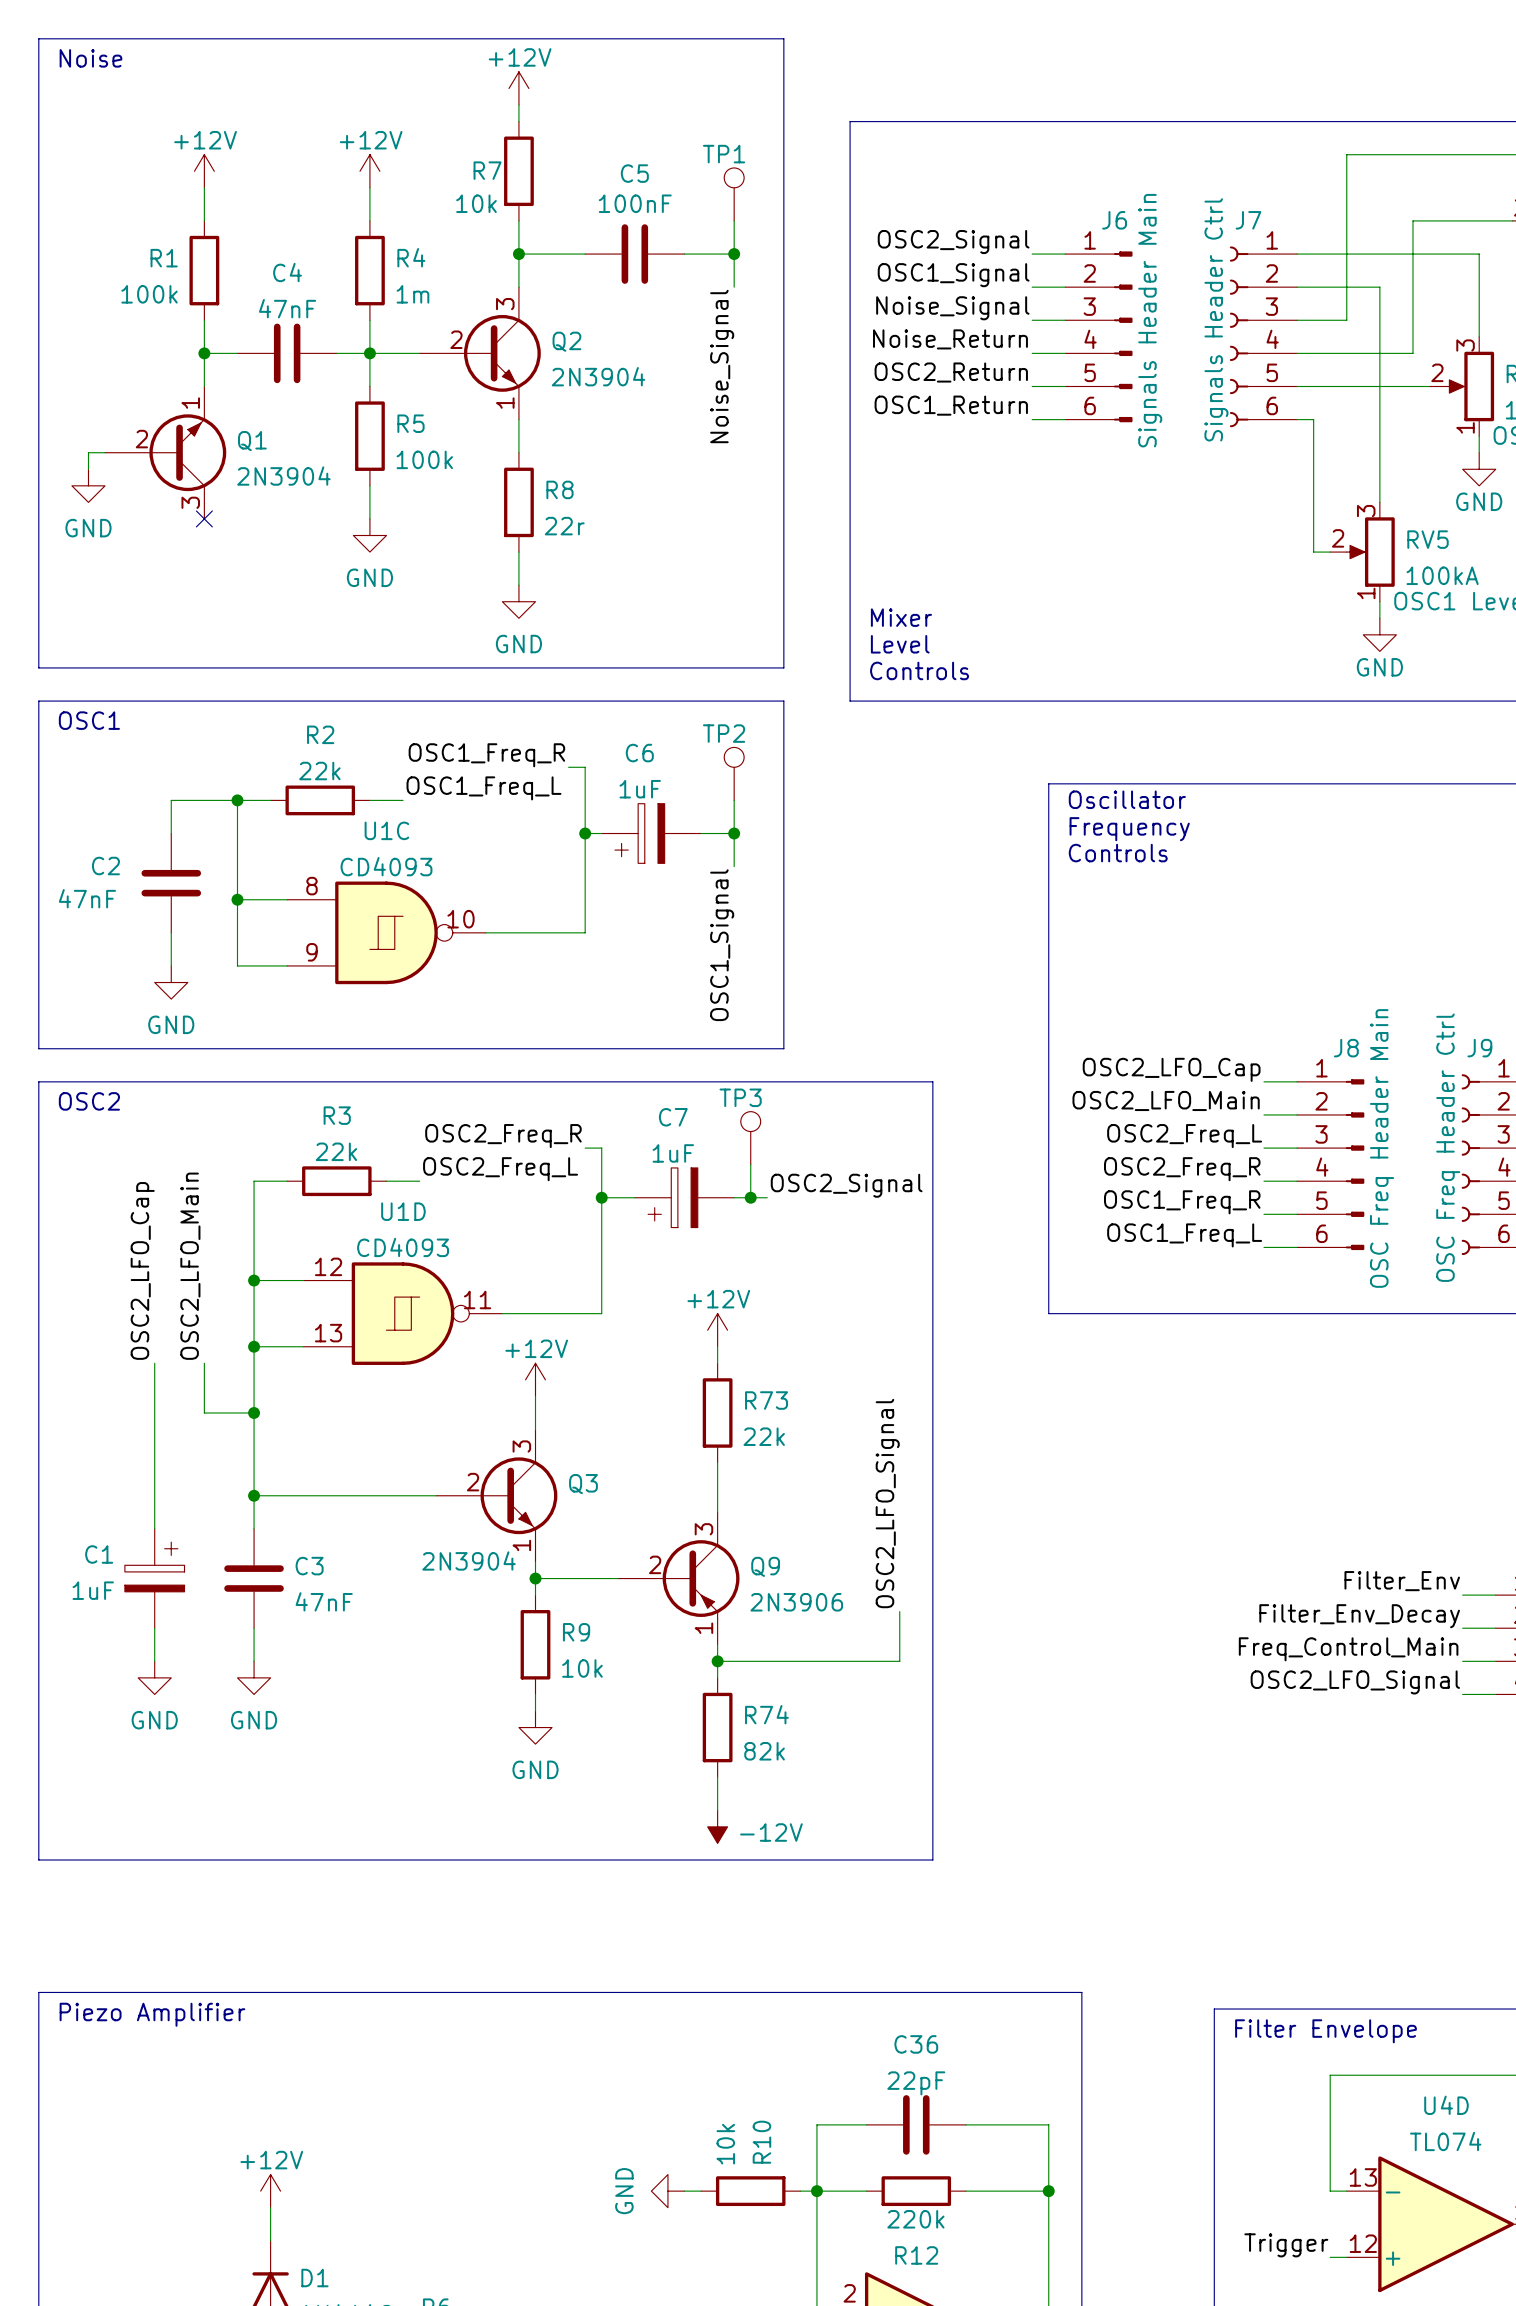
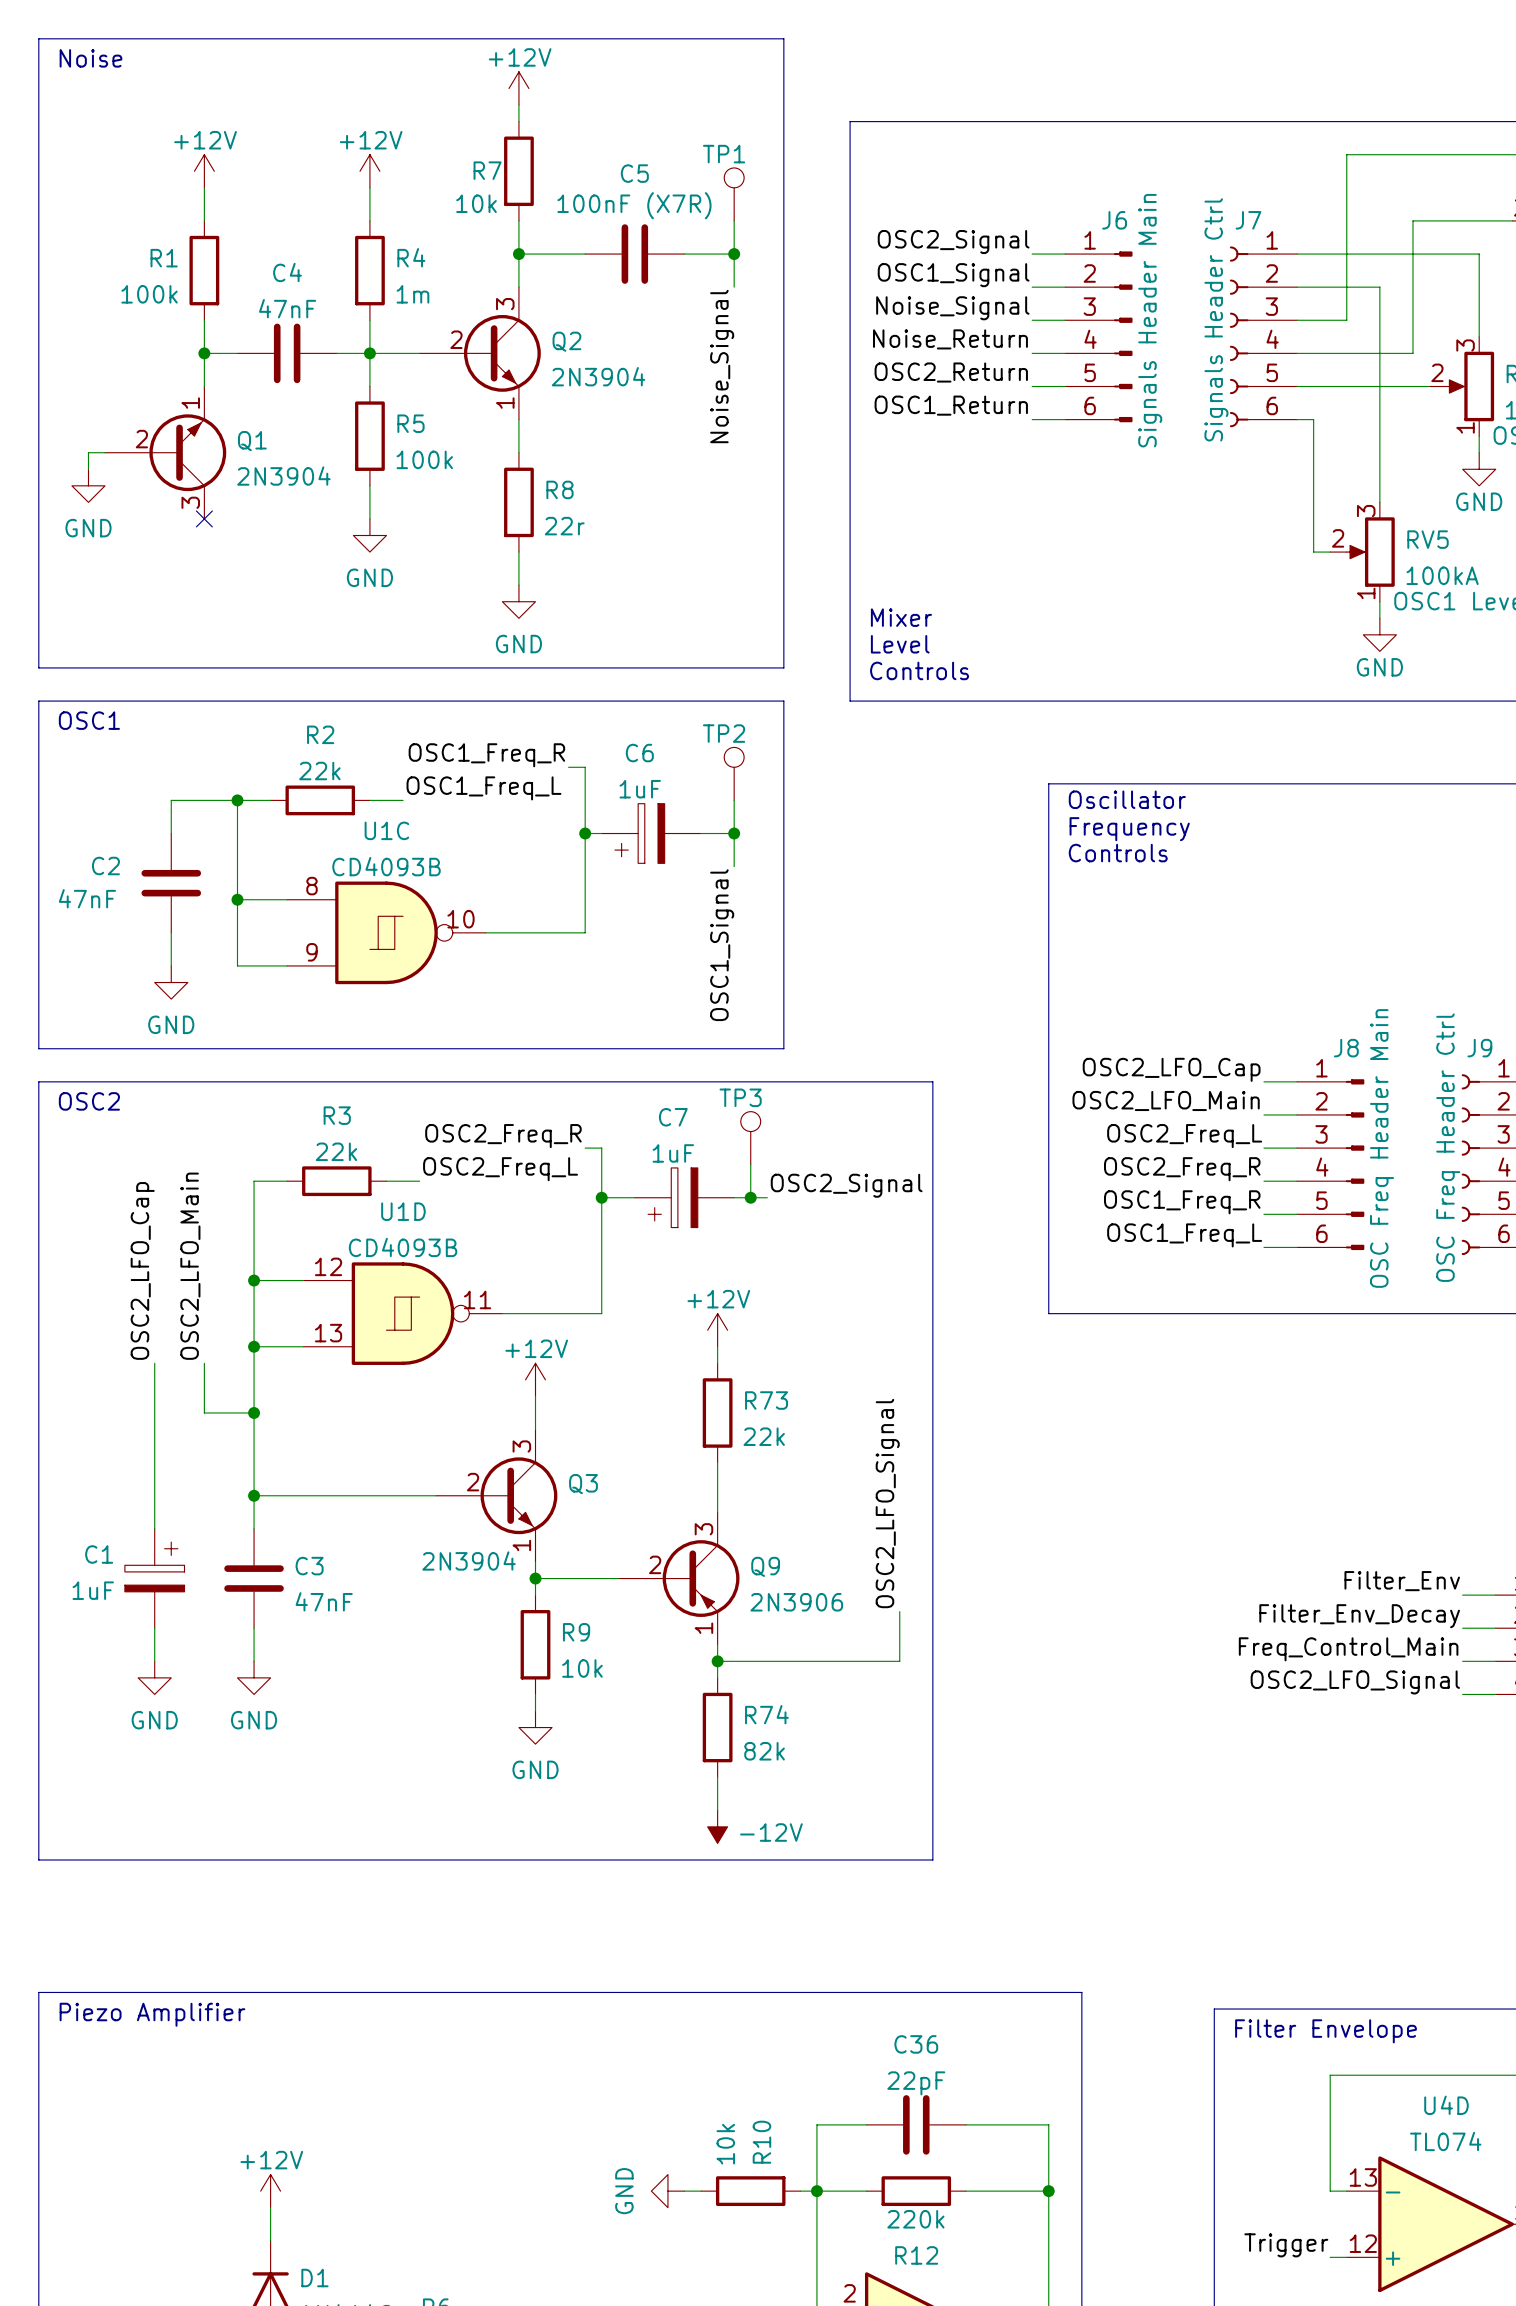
C5 value: 100nF (635, 203) -> 100nF (X7R) (634, 205)
U1C value: CD4093 (386, 866) -> CD4093B (386, 866)
U1D value: CD4093 (403, 1247) -> CD4093B (403, 1247)

